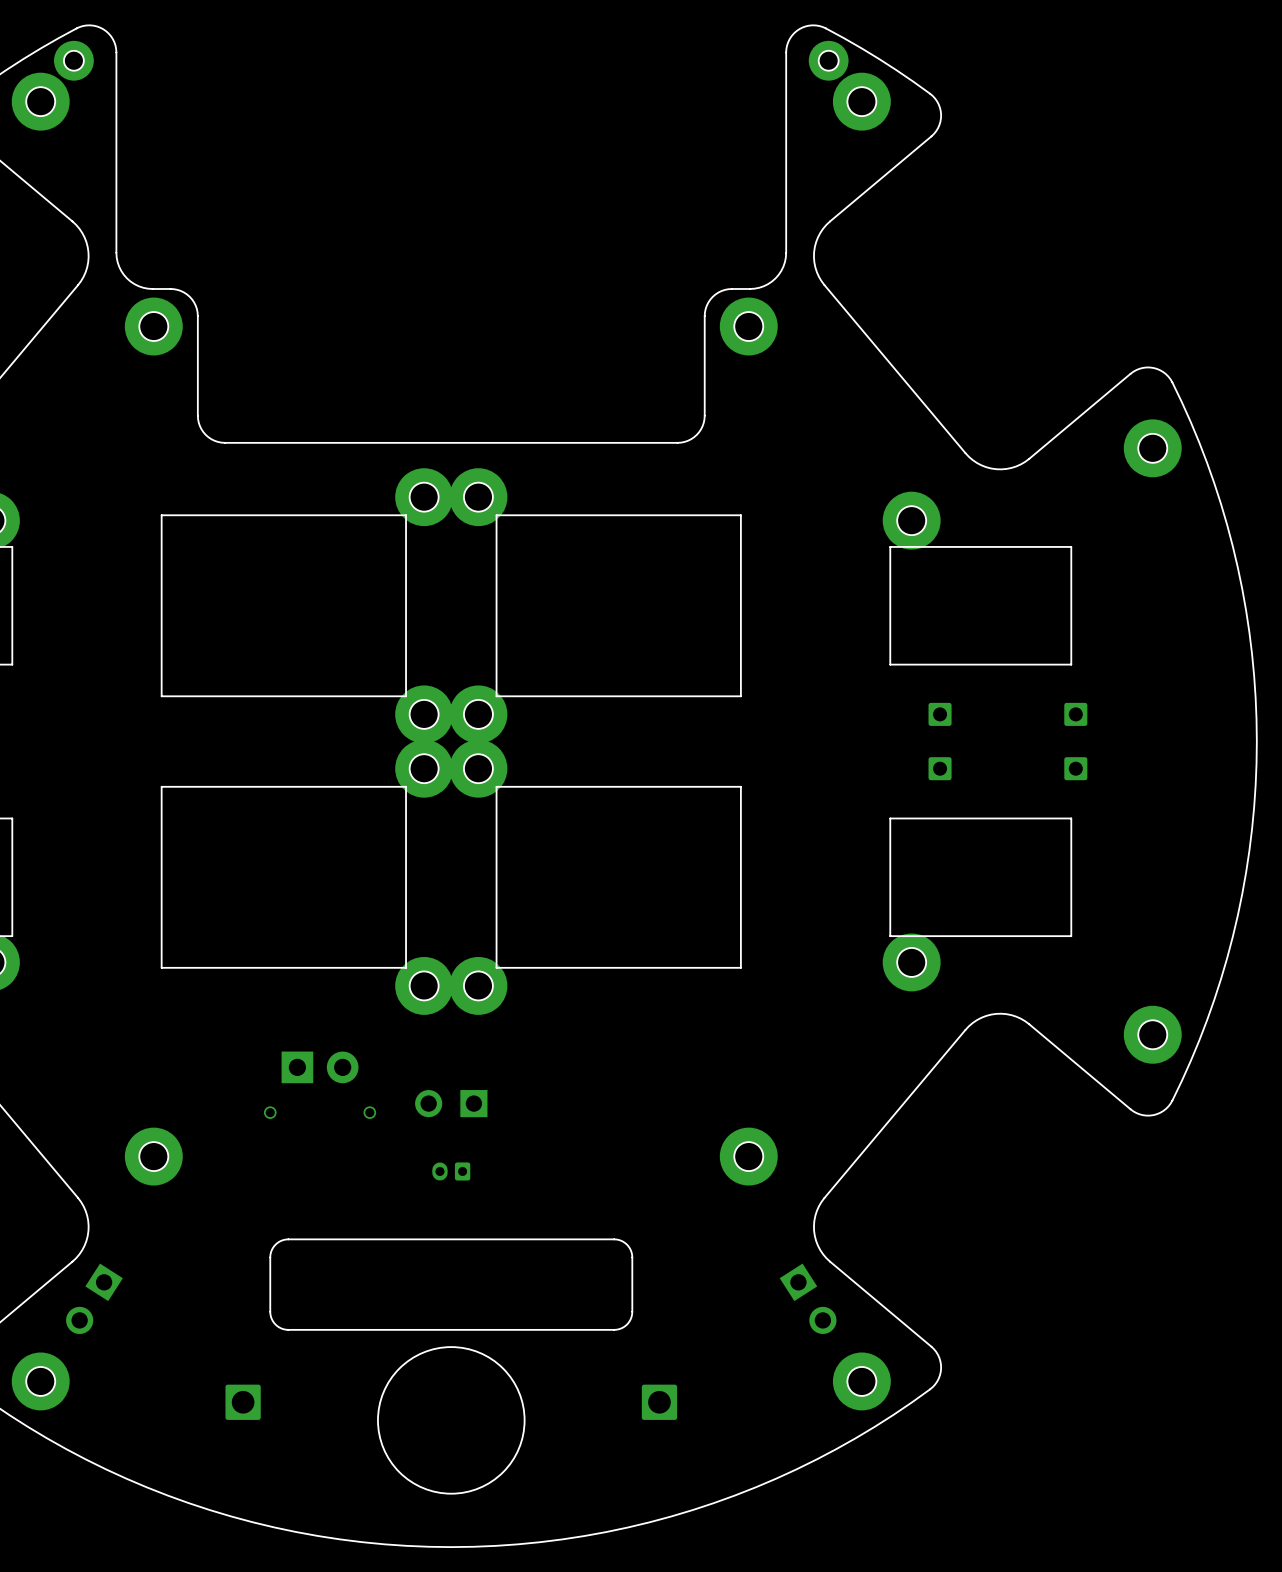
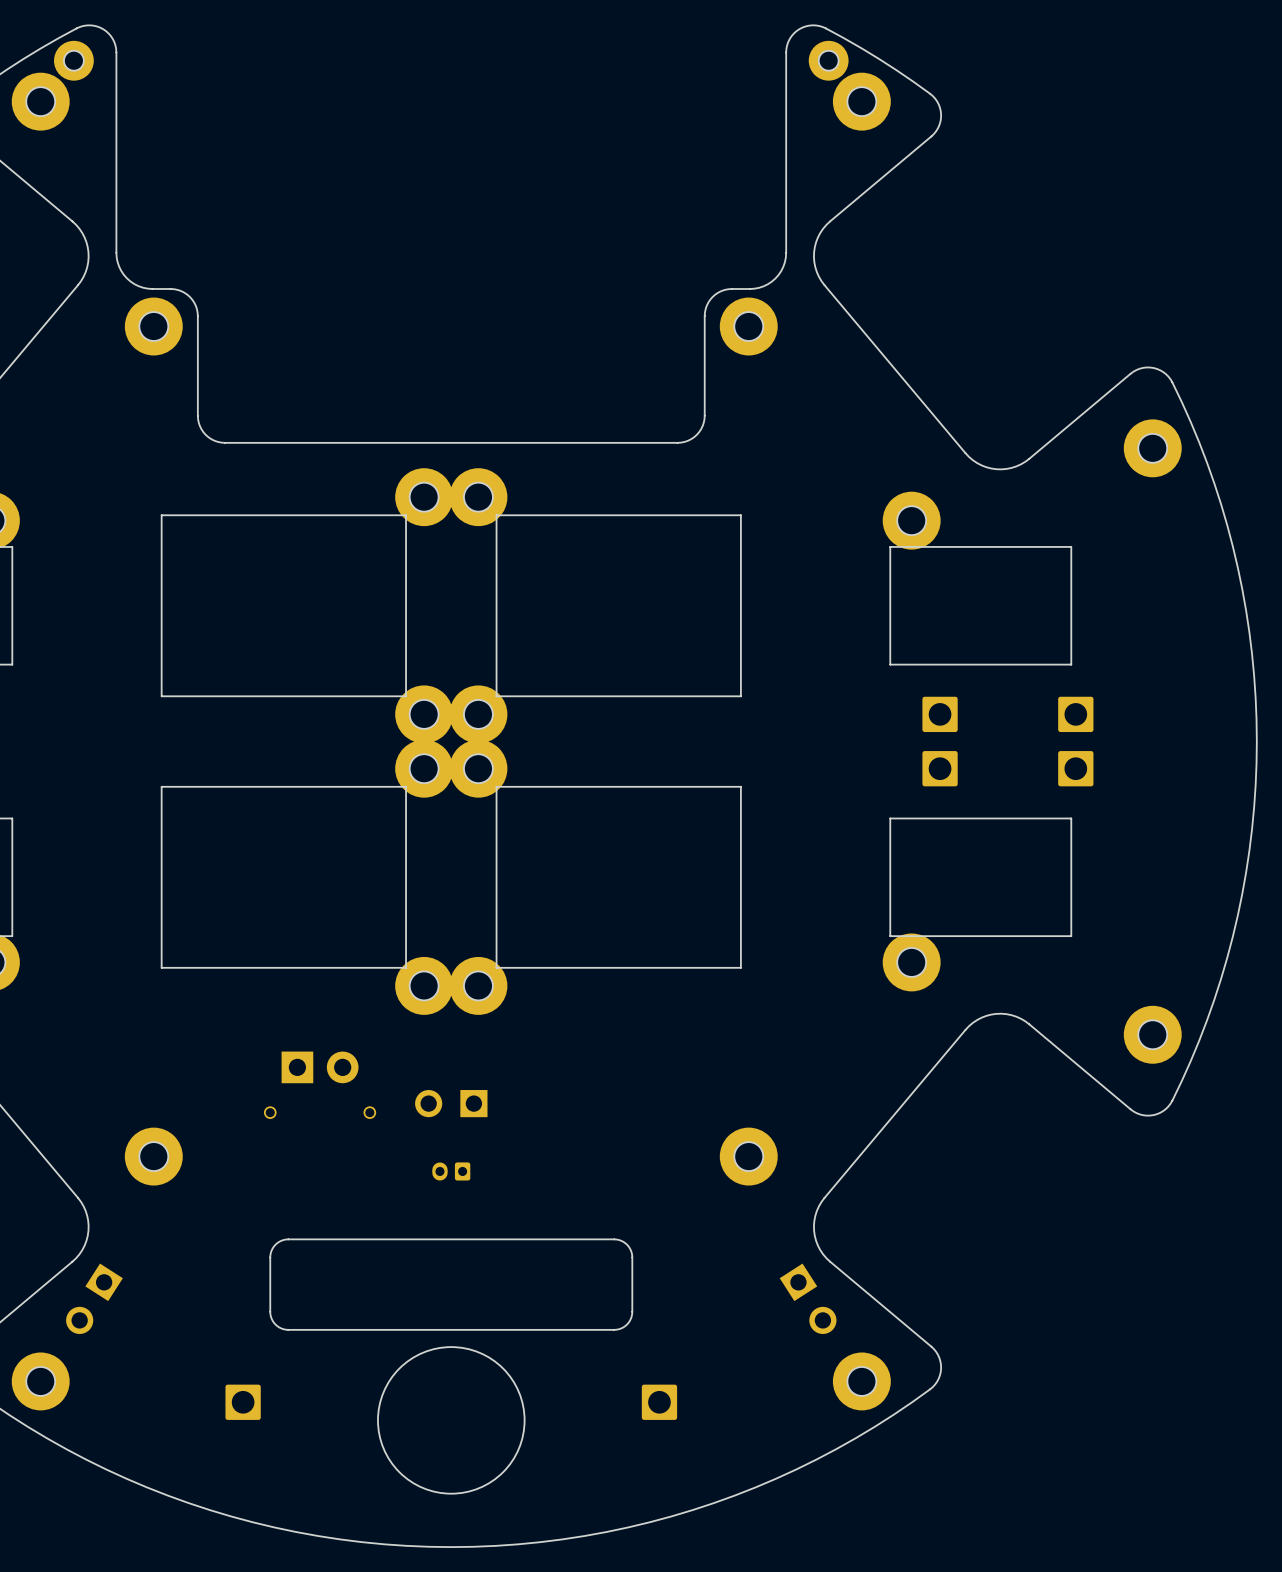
part footprint: [928, 702, 952, 726] -> [922, 696, 958, 733]
part footprint: [1064, 702, 1088, 726] -> [1058, 696, 1094, 733]
part footprint: [928, 757, 952, 781] -> [922, 751, 958, 787]
part footprint: [1064, 757, 1088, 781] -> [1058, 751, 1094, 787]

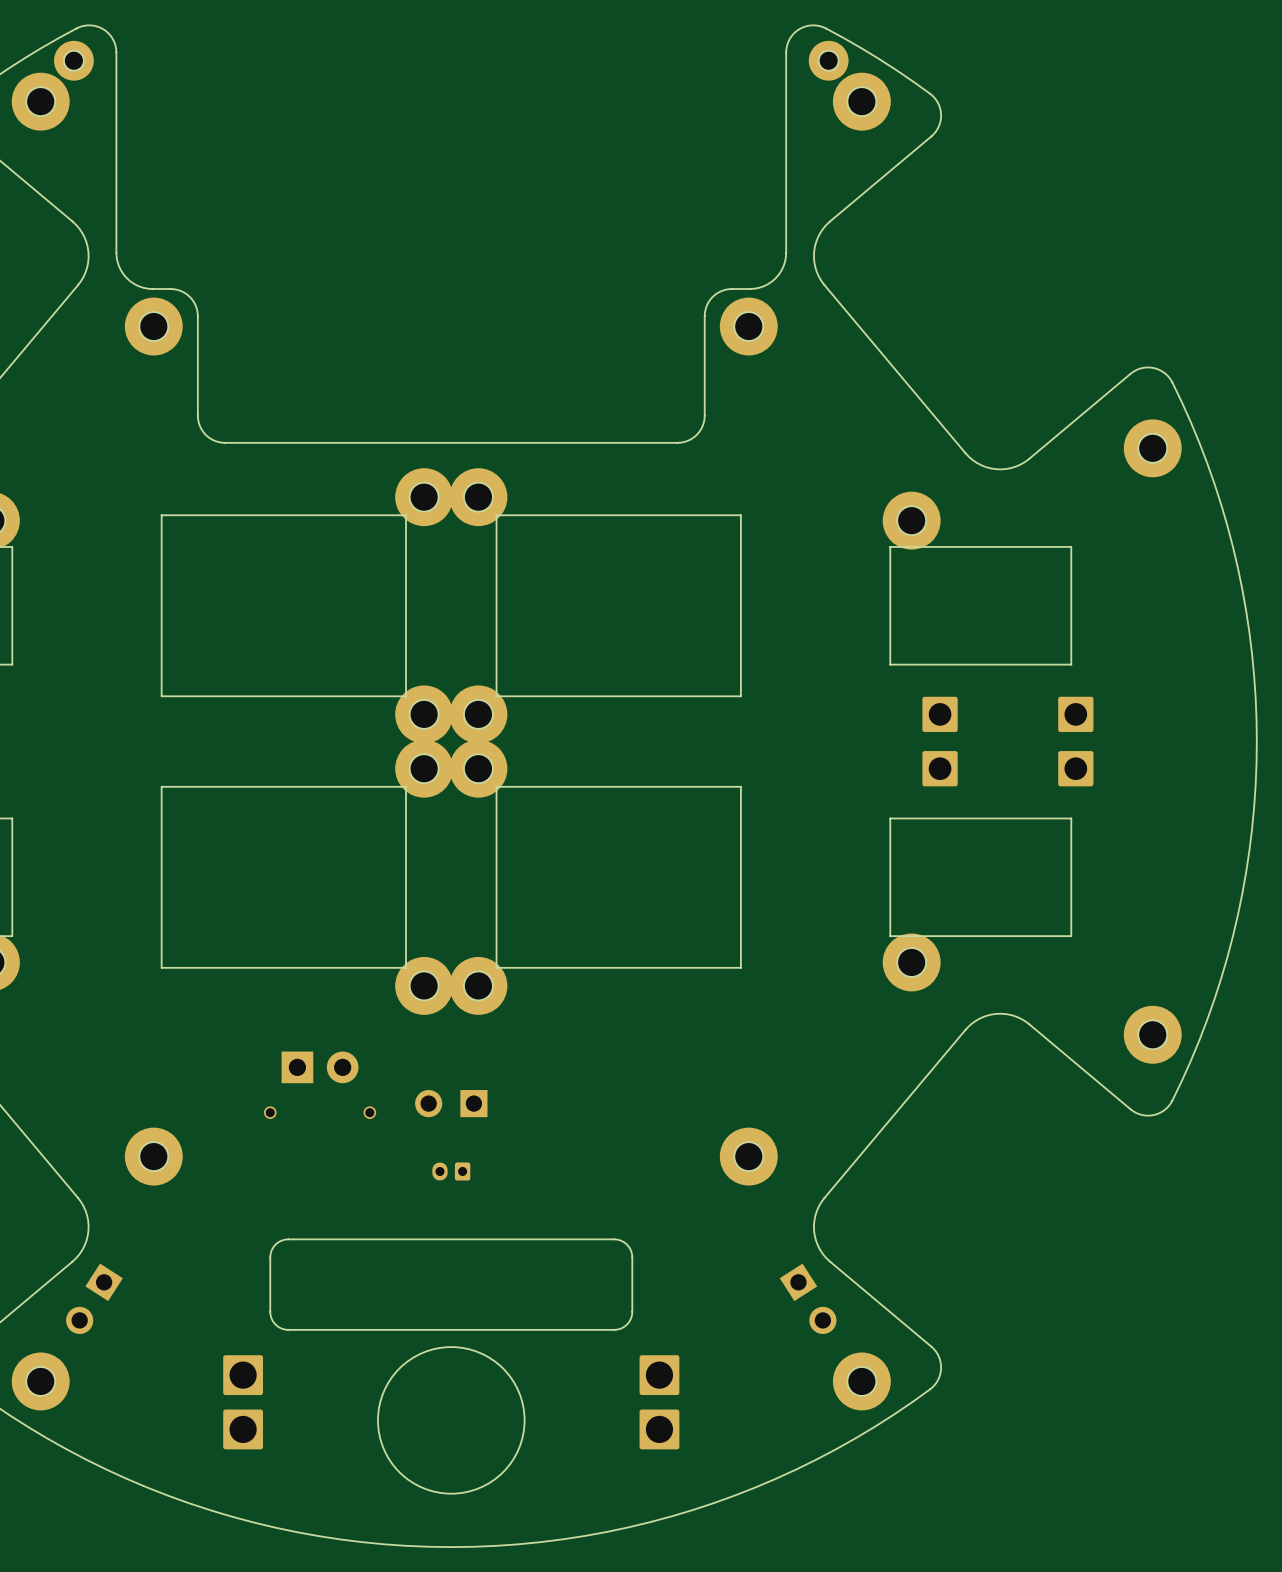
part: none -> (243, 1375)
part: none -> (659, 1375)
part: (243, 1402) -> none
part: (659, 1402) -> none
part: none -> (243, 1429)
part: none -> (659, 1429)

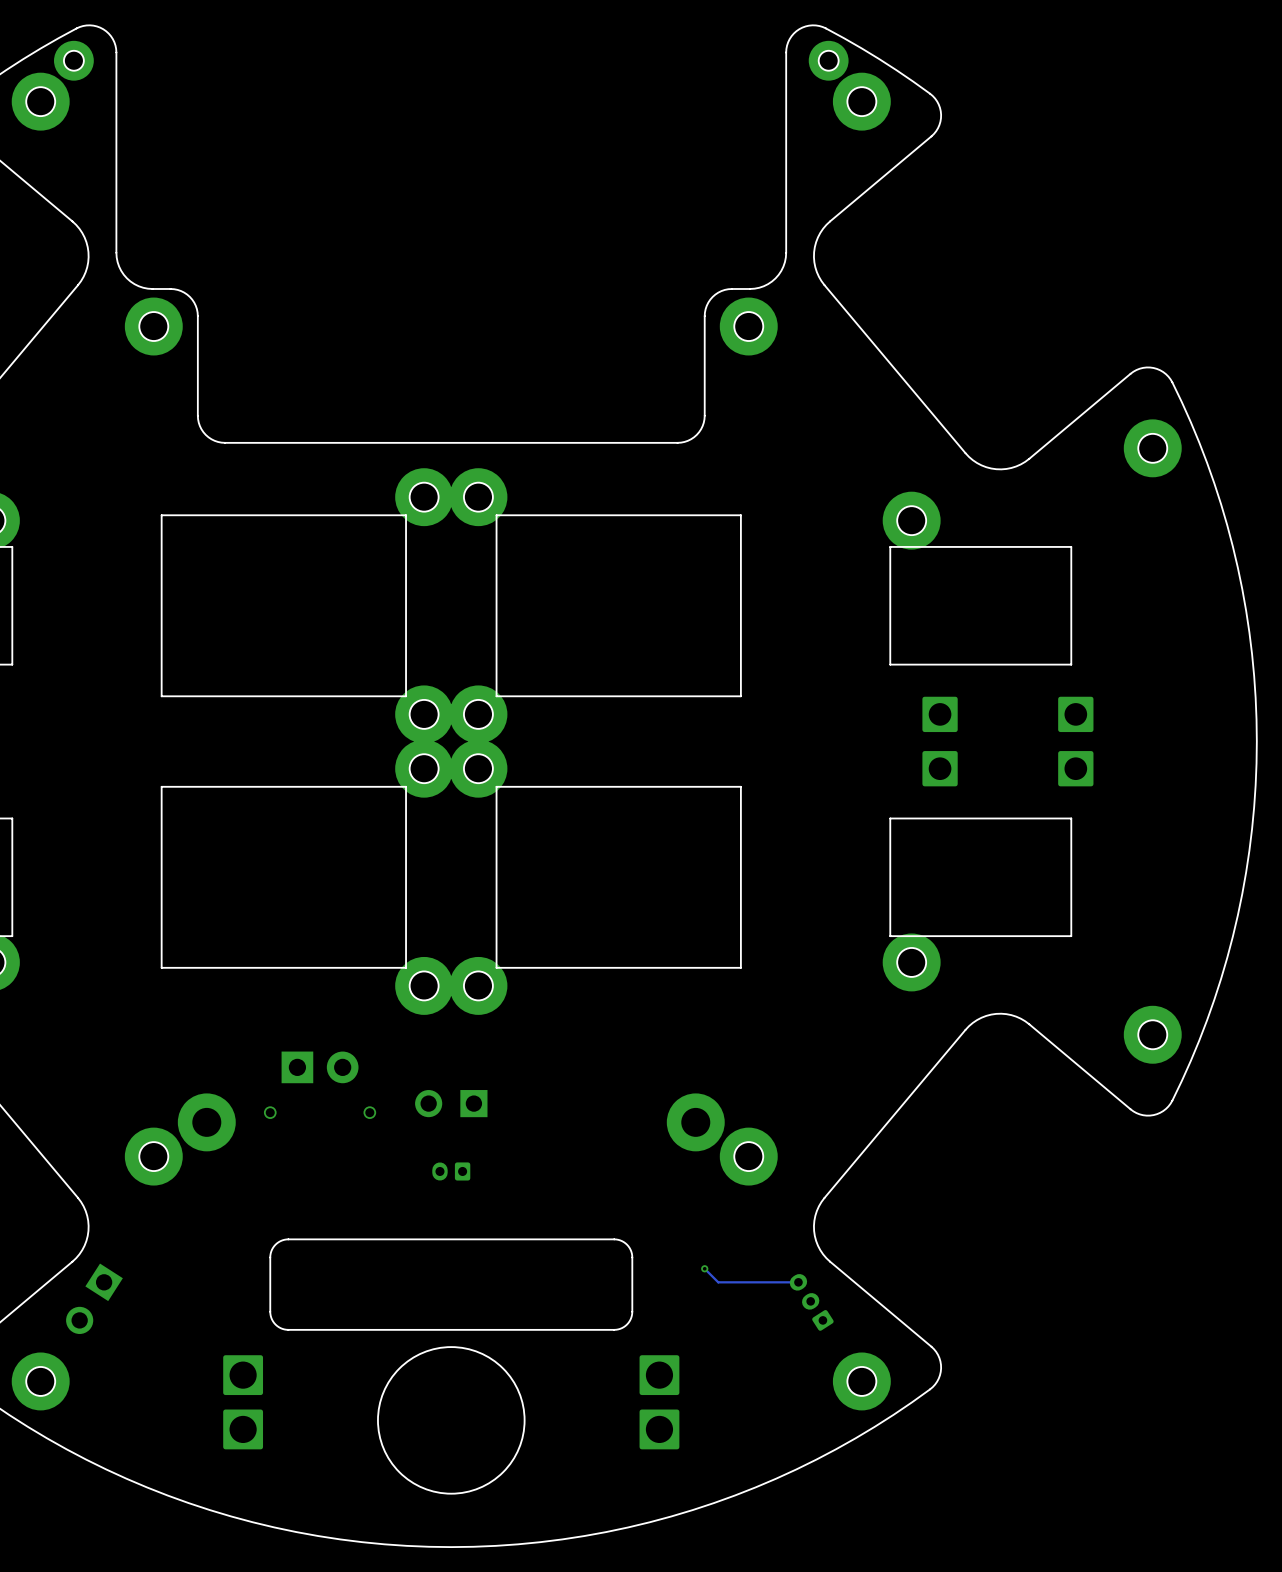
part: none -> (206, 1122)
part: none -> (695, 1122)
part footprint: [779, 1263, 837, 1334] -> [789, 1274, 834, 1331]
track: none -> (704, 1268) (718, 1282) (798, 1282)
via: none -> (704, 1268)

